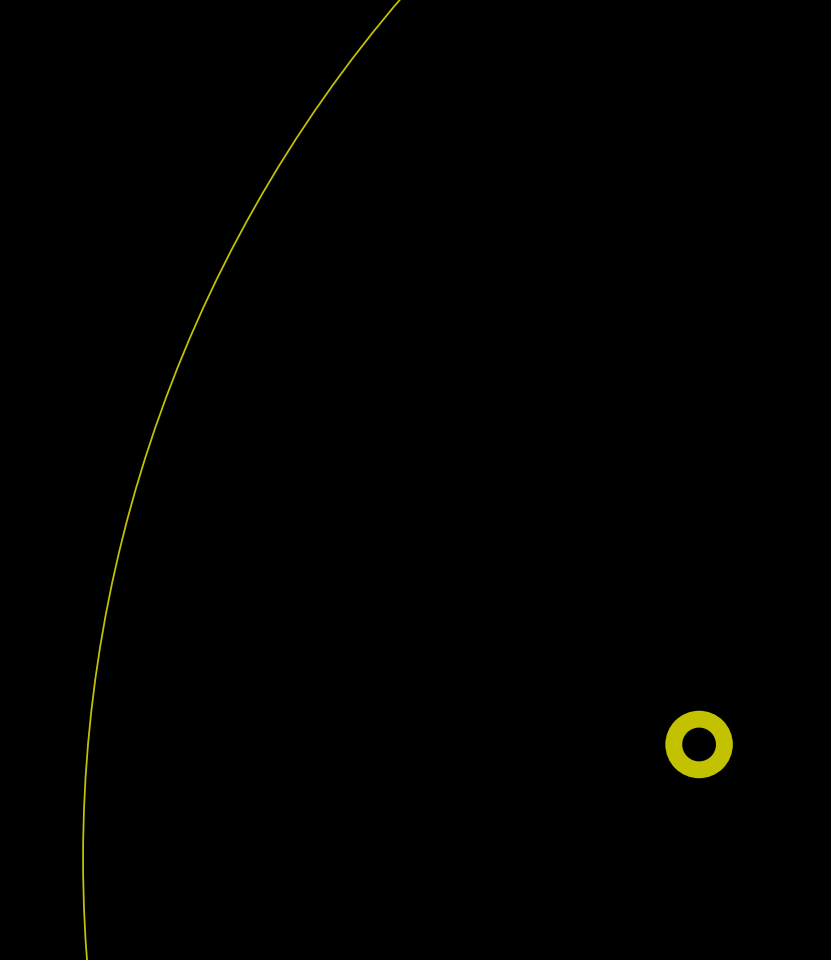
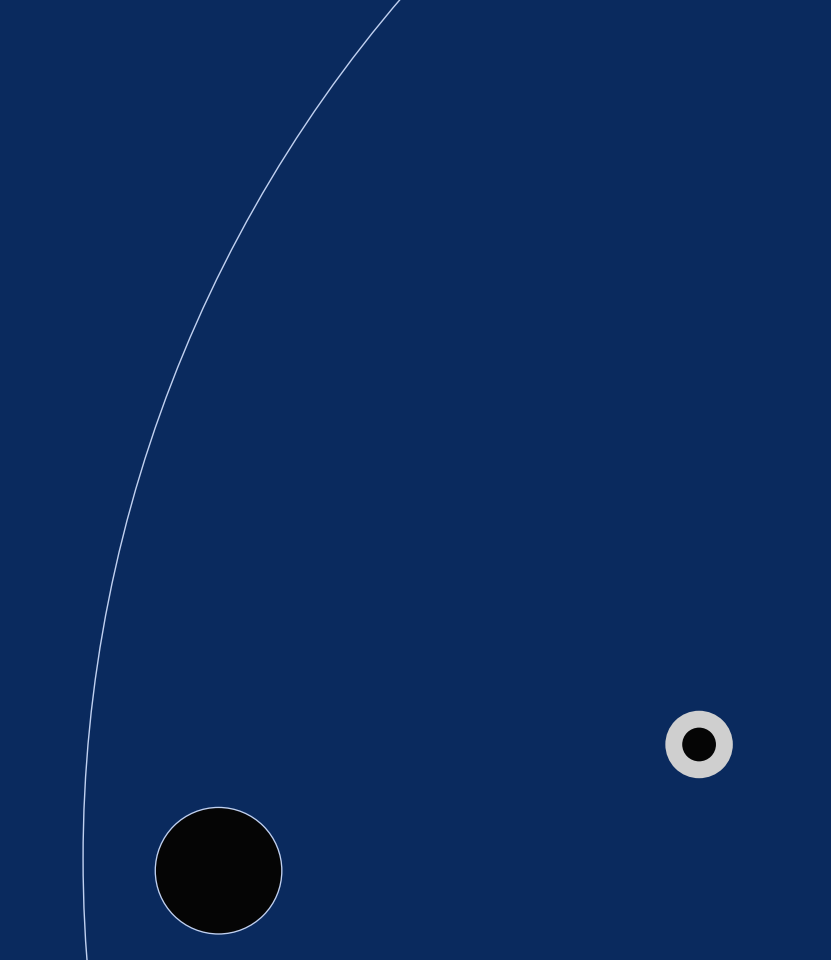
part: none -> (218, 870)

